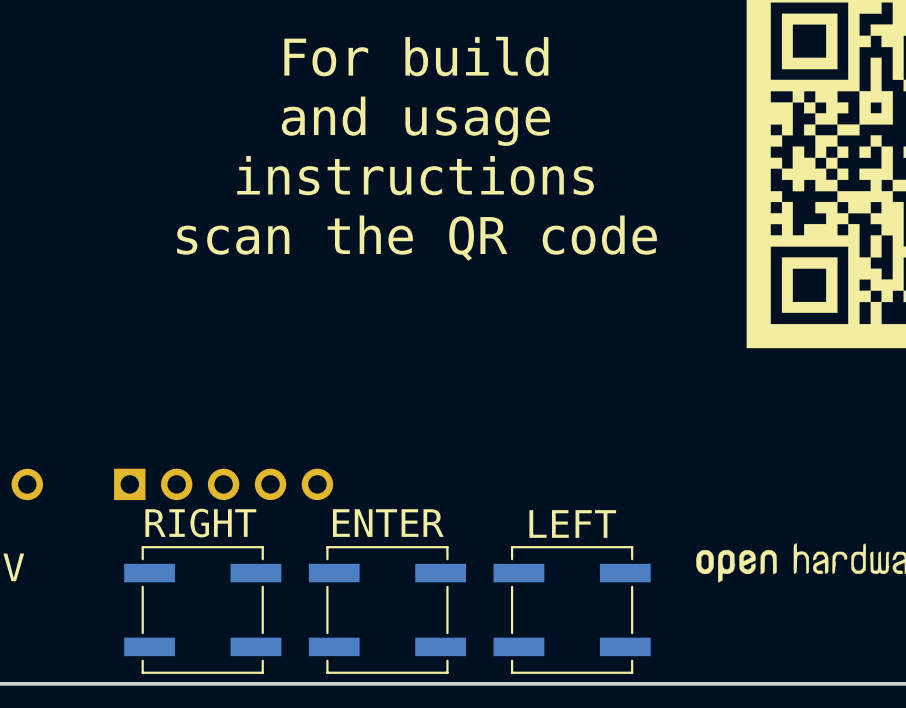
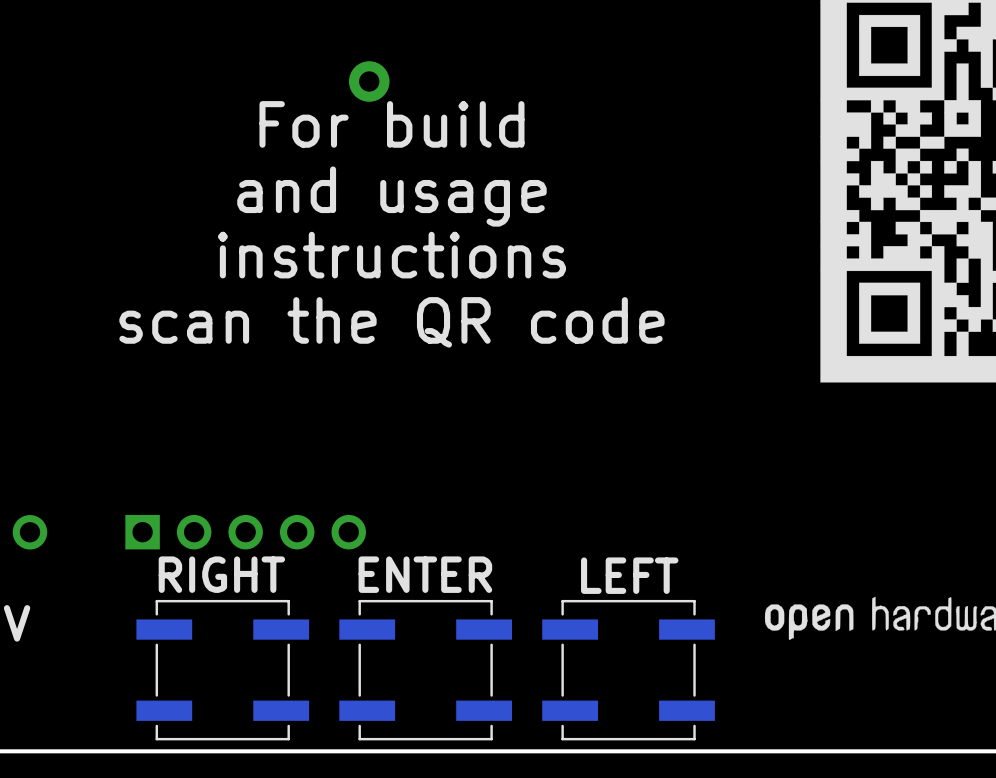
text position: For build (416, 56) -> For build (391, 124)
part: none -> (369, 81)
text position: and usage (416, 121) -> and usage (391, 196)
text position: instructions (415, 175) -> instructions (391, 255)
text position: scan the QR code (417, 238) -> scan the QR code (391, 322)

